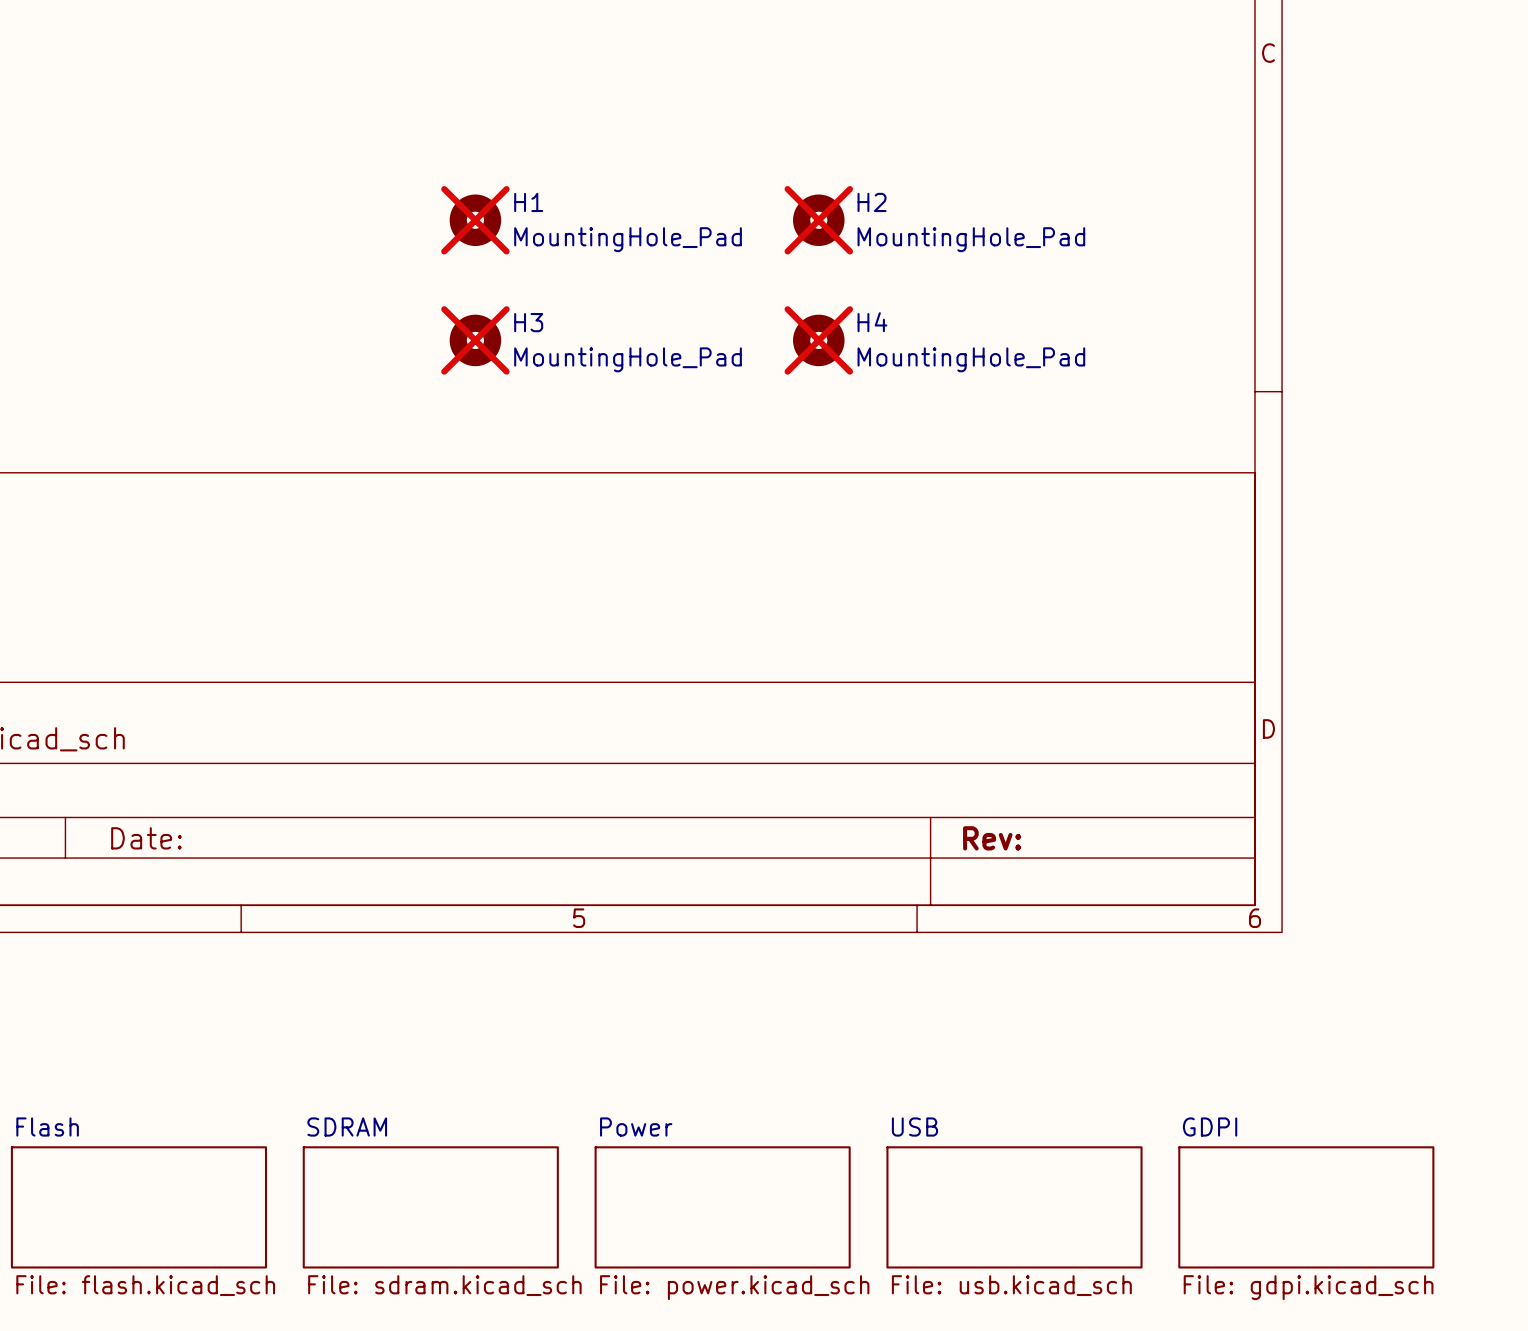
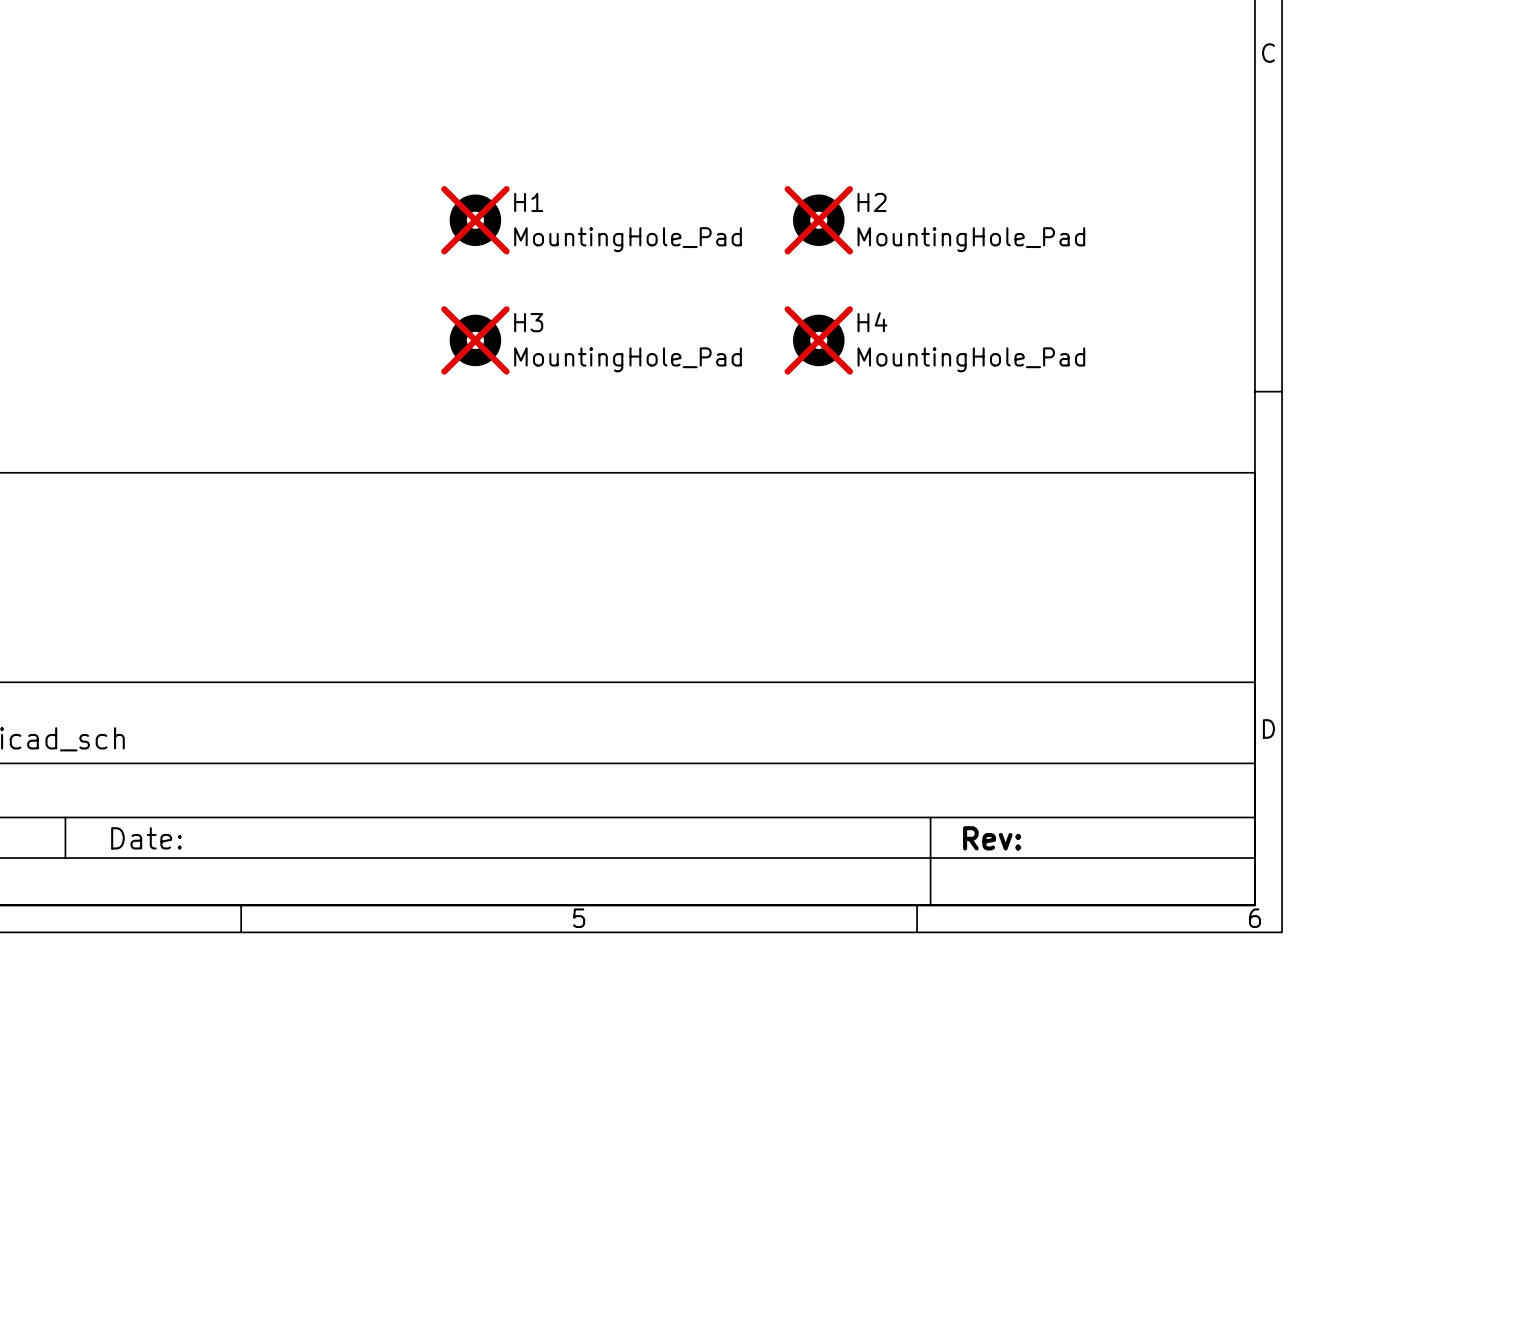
sheet Flash: File: flash.kicad_sch (138, 1207) -> none
sheet SDRAM: File: sdram.kicad_sch (430, 1207) -> none
sheet Power: File: power.kicad_sch (722, 1207) -> none
sheet USB: File: usb.kicad_sch (1014, 1207) -> none
sheet GDPI: File: gdpi.kicad_sch (1306, 1207) -> none

